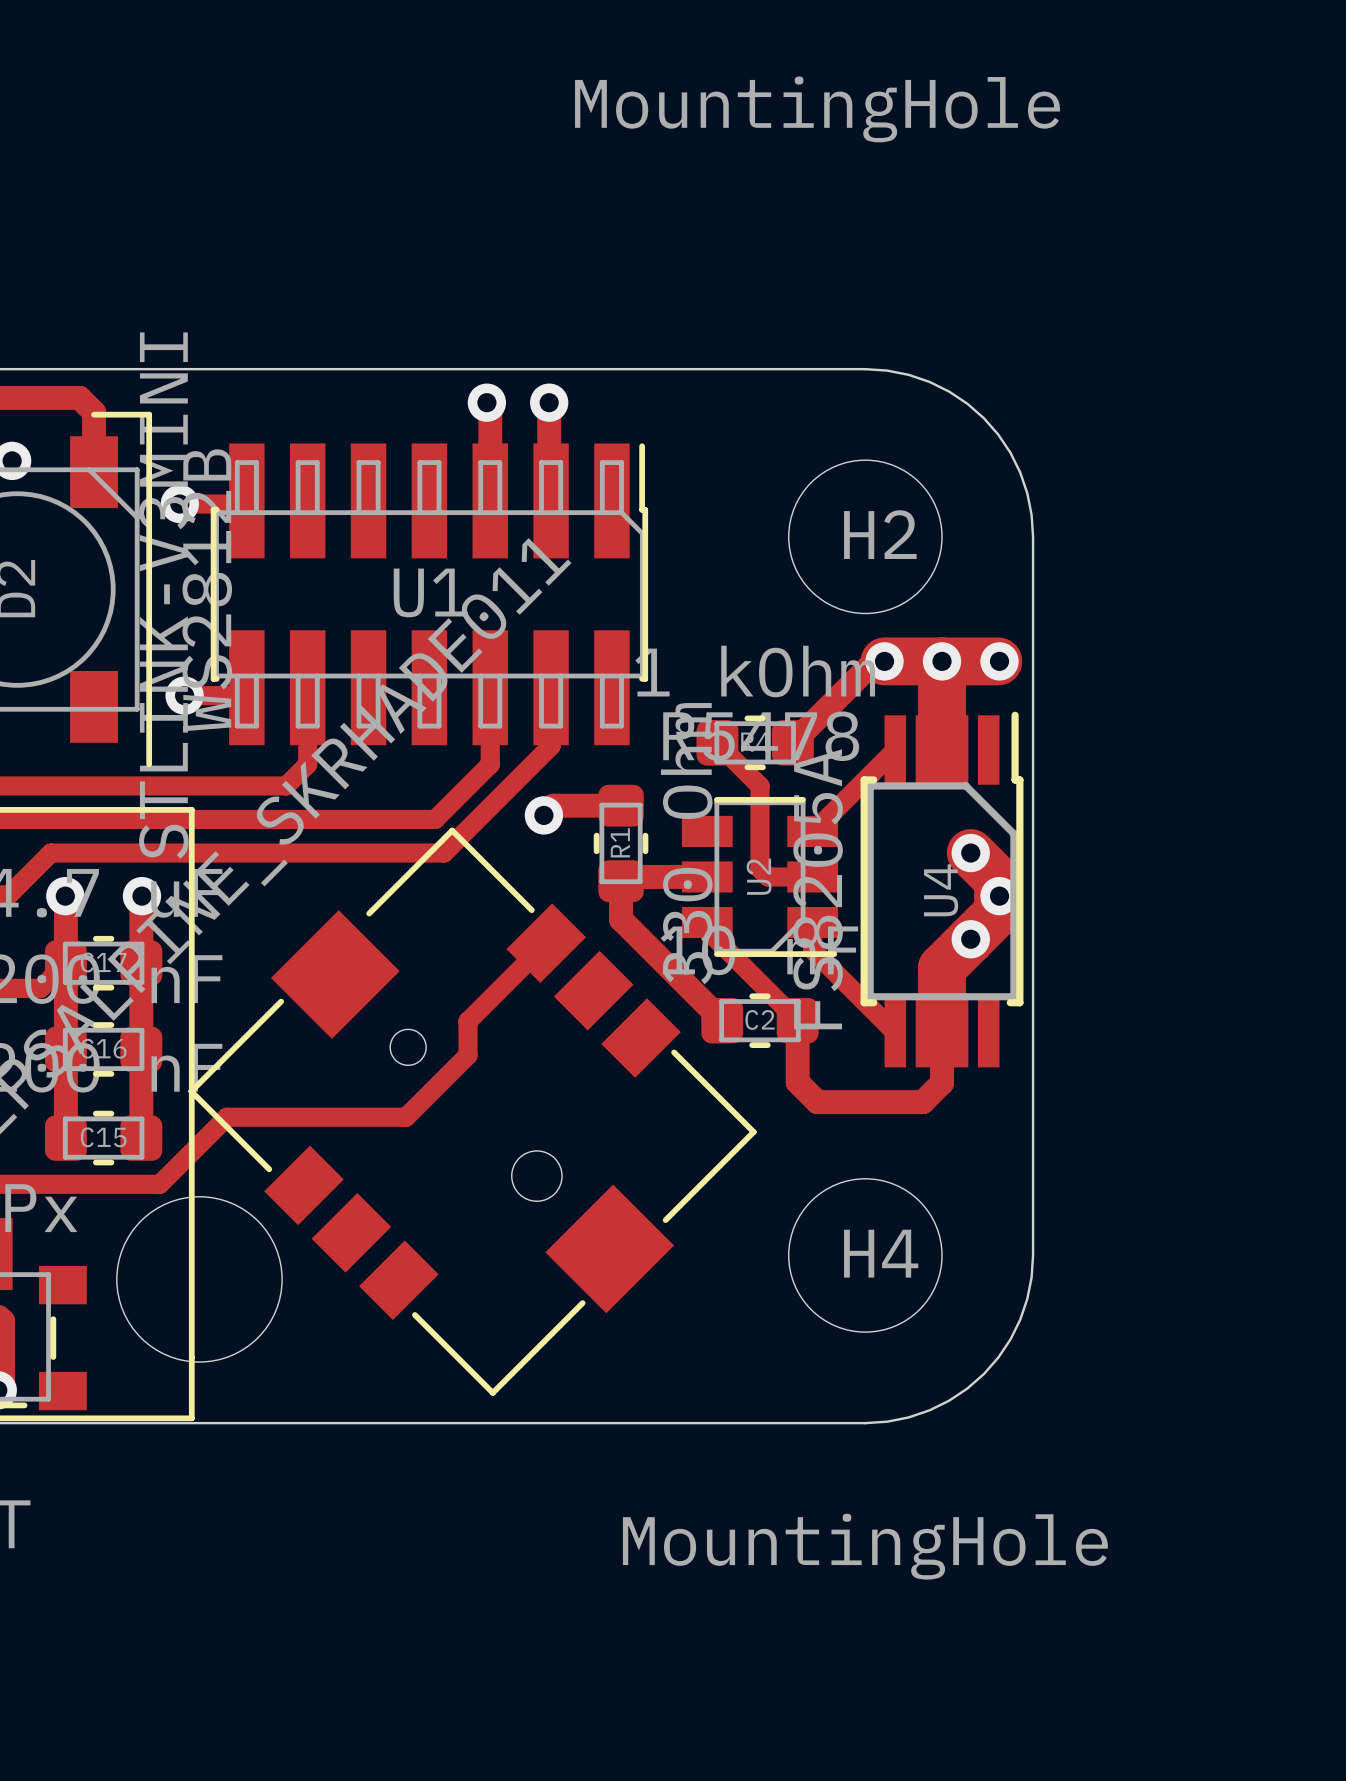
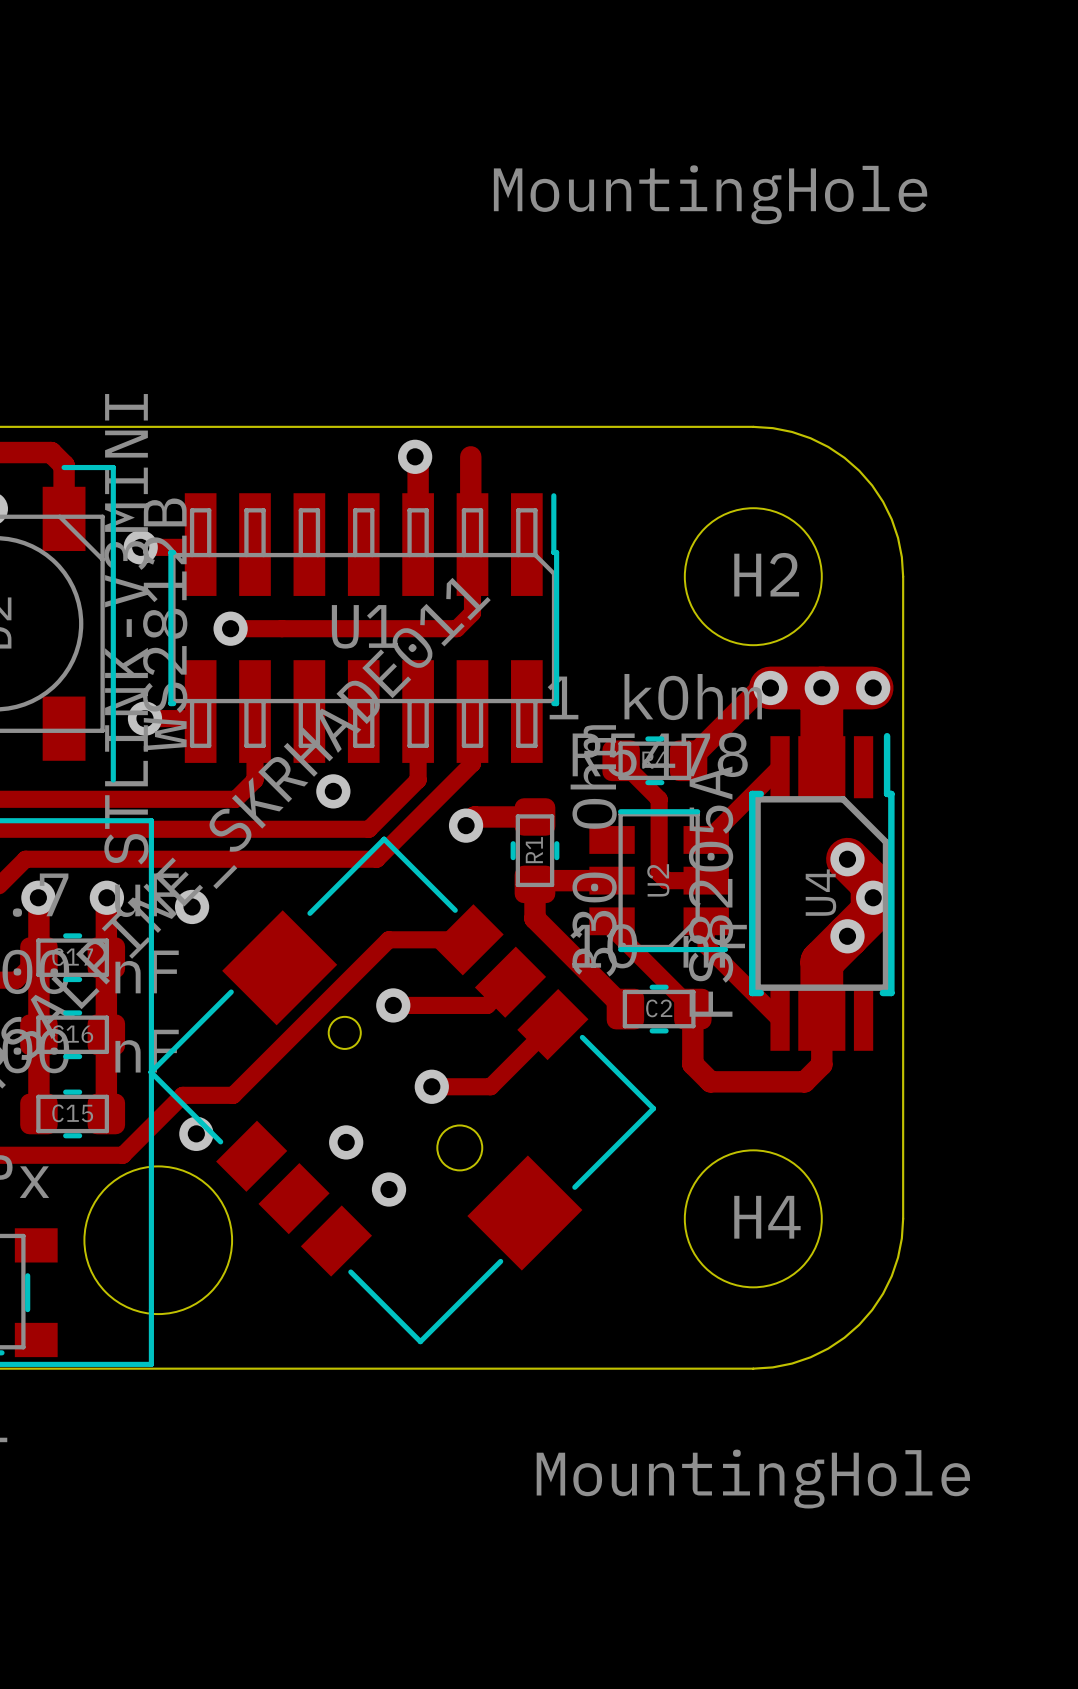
via: (549, 402) -> none
track: none -> (472, 544) (472, 613) (456, 628) (230, 628)
via: none -> (230, 628)
via: none -> (333, 791)
via: none -> (192, 906)
track: (546, 943) (467, 1021) (467, 1055) (406, 1117) (283, 1117) -> (468, 939) (388, 939) (233, 1095)
track: none -> (510, 982) (487, 1005) (393, 1005)
via: none -> (393, 1005)
track: none -> (552, 1024) (490, 1086) (431, 1086)
via: none -> (431, 1086)
via: none -> (196, 1133)
via: none -> (346, 1142)
via: none -> (389, 1189)

